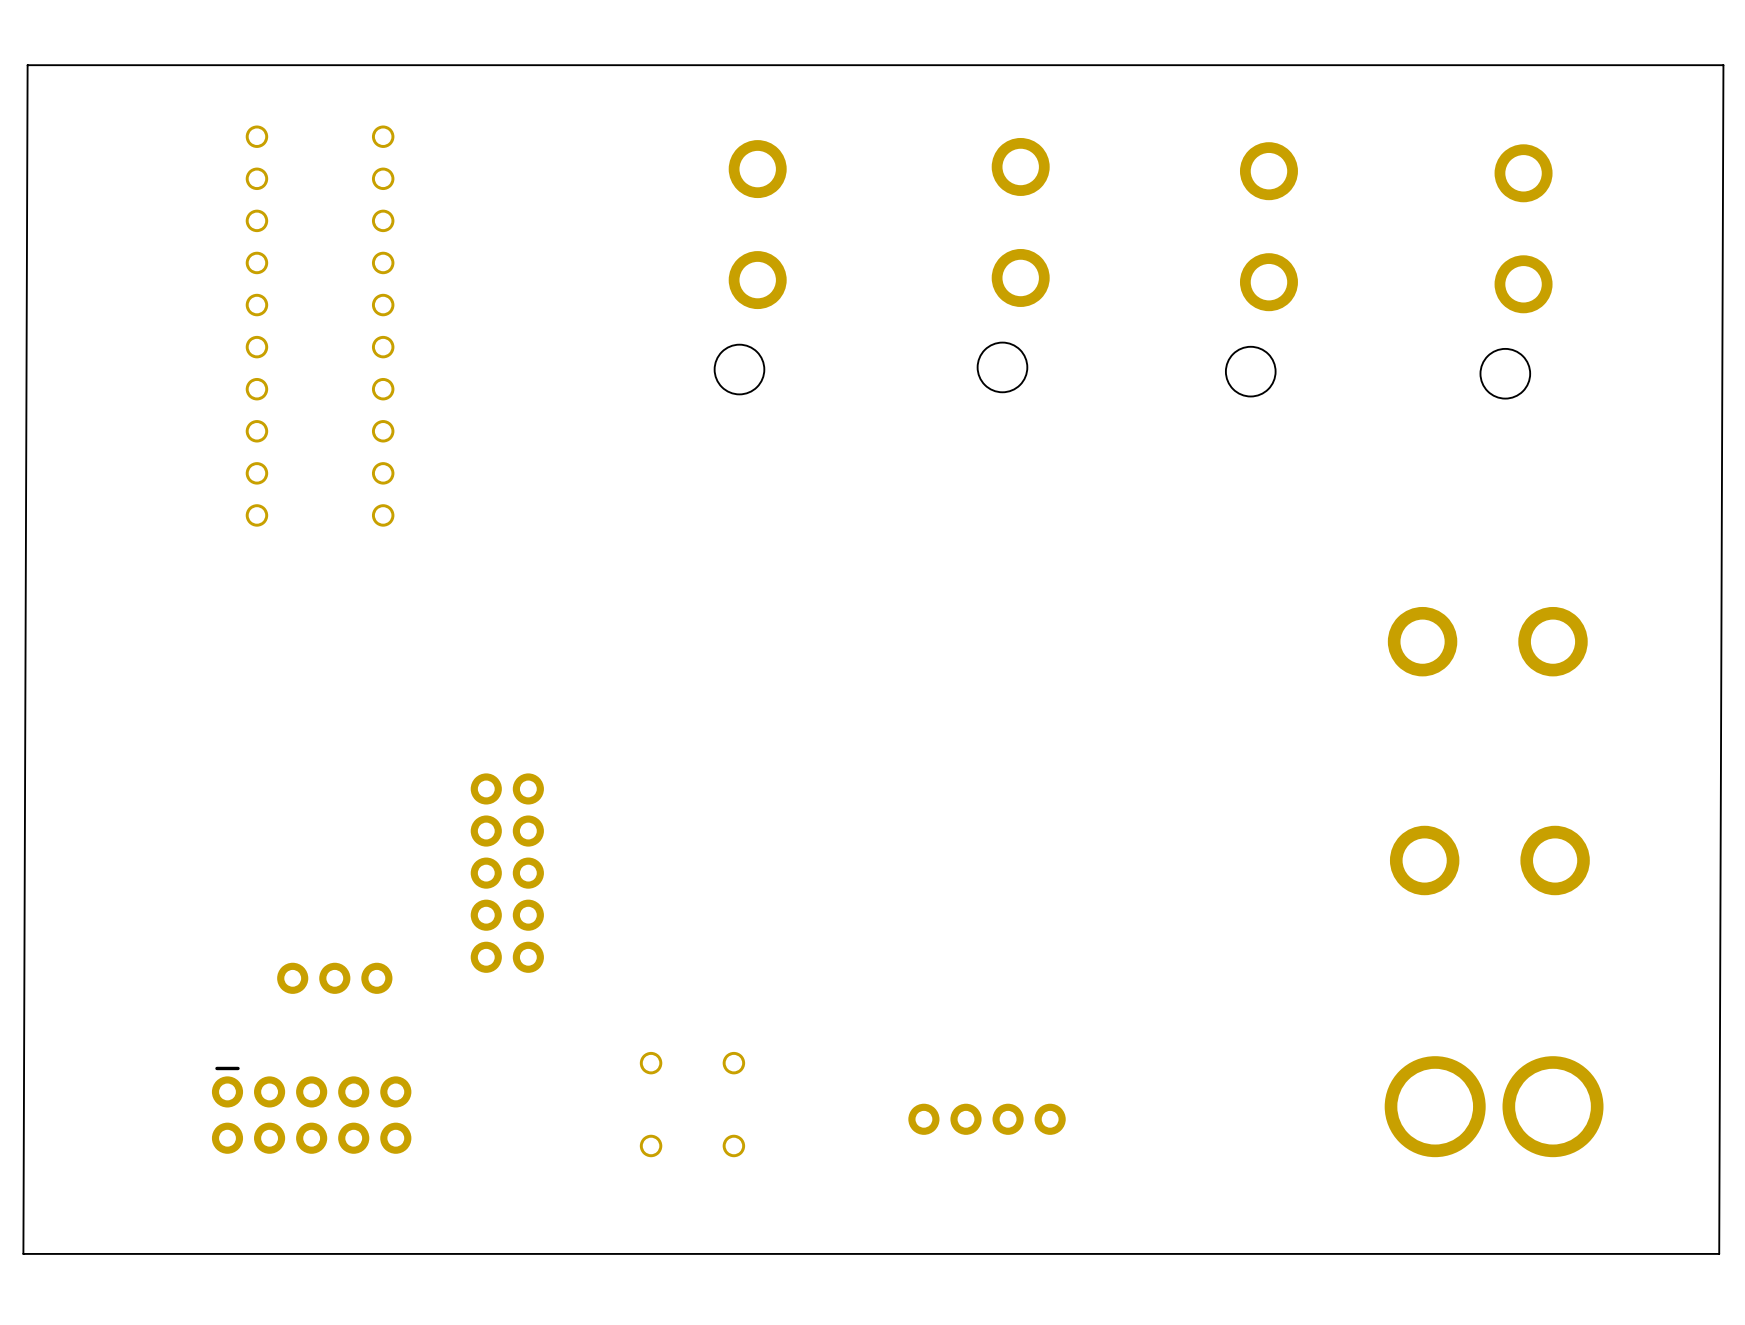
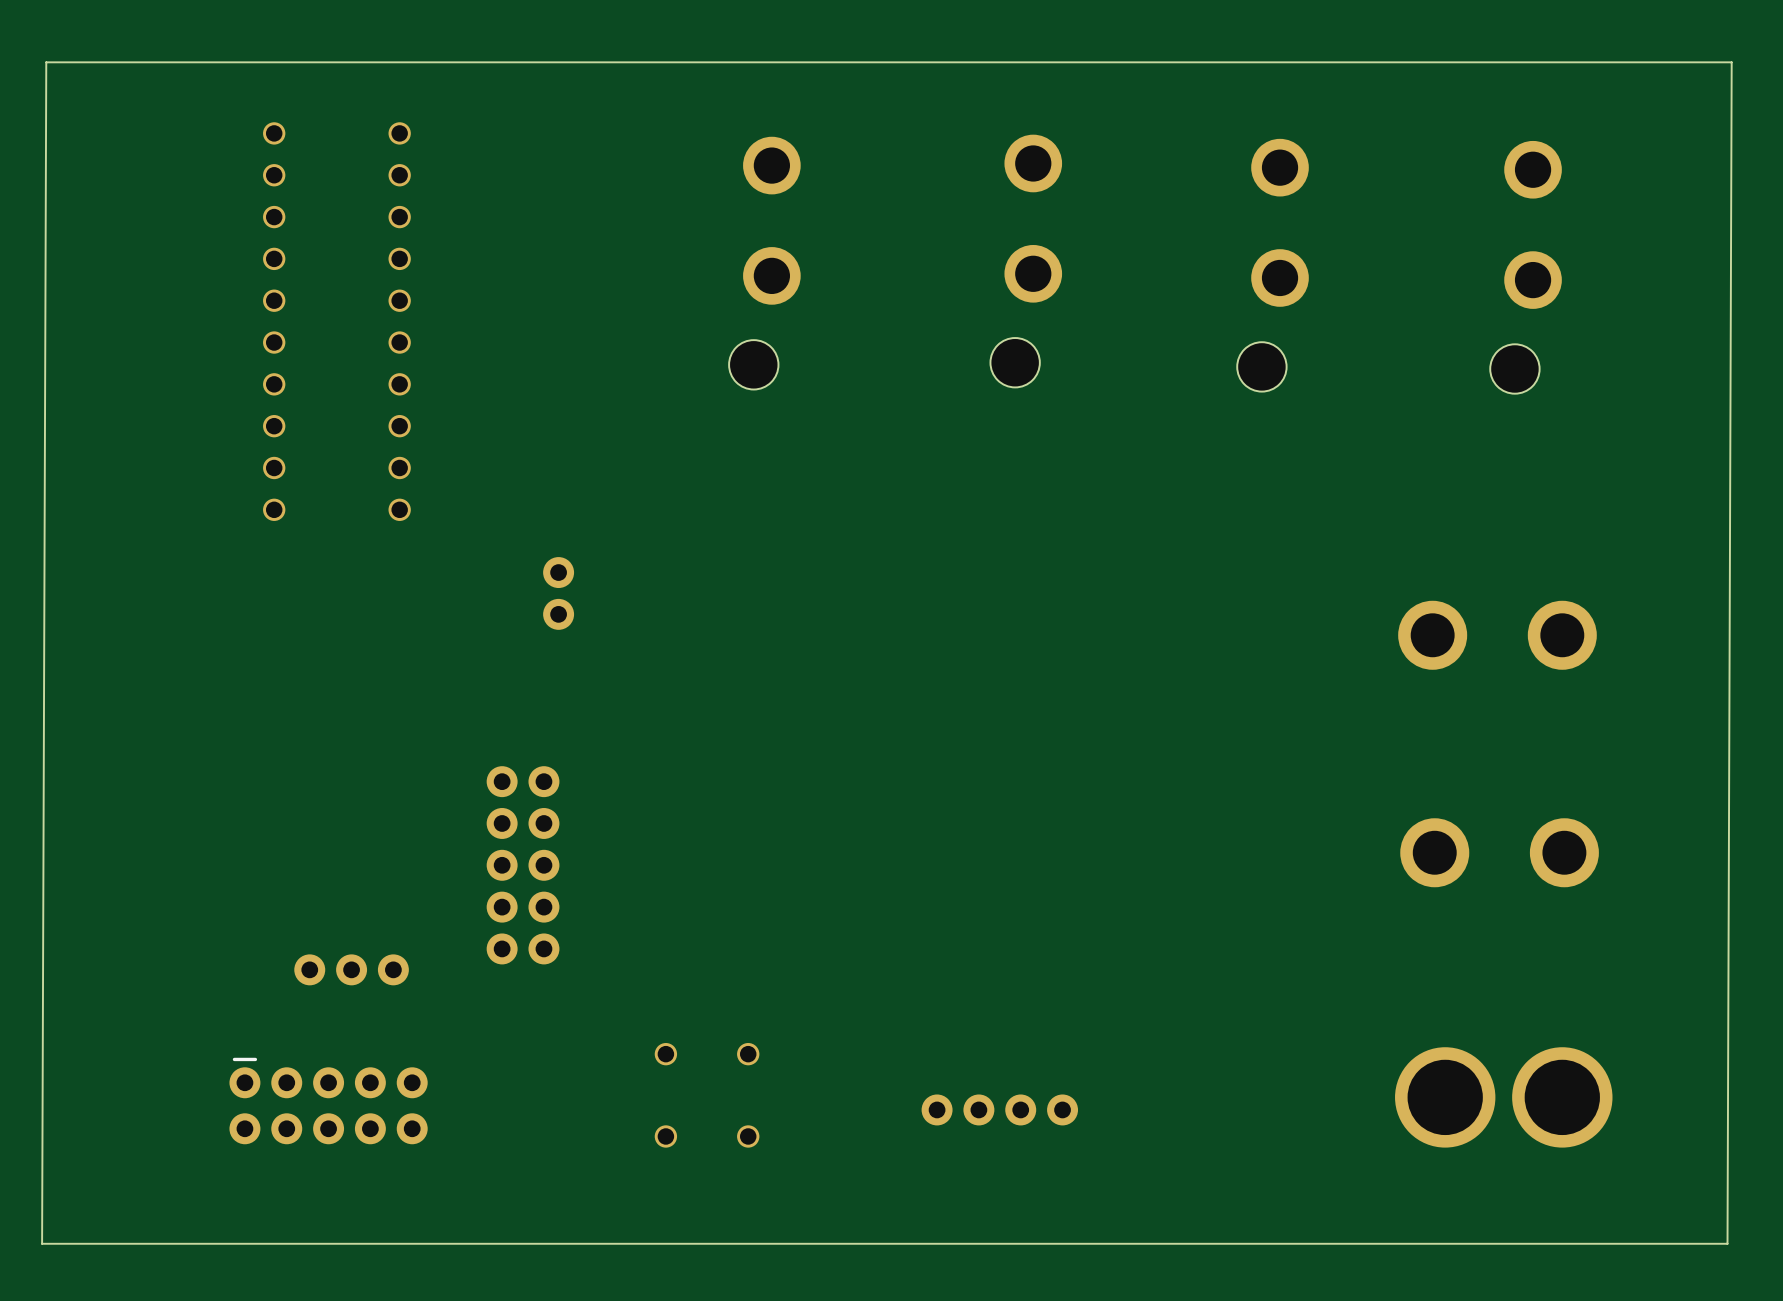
part: none -> (558, 593)

